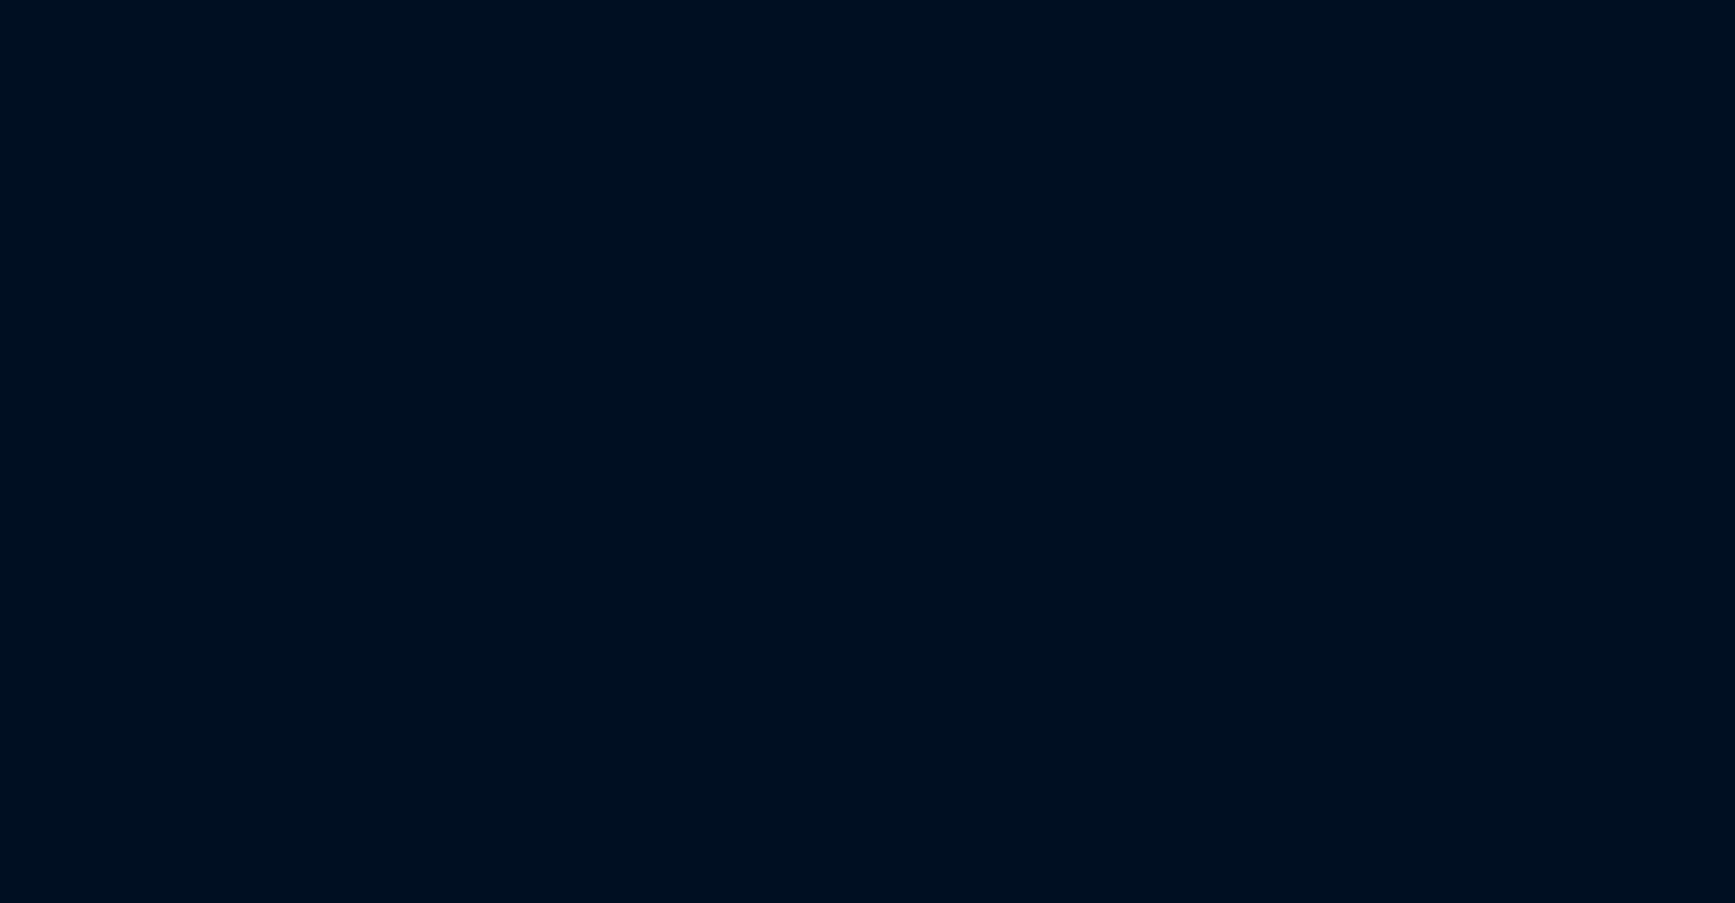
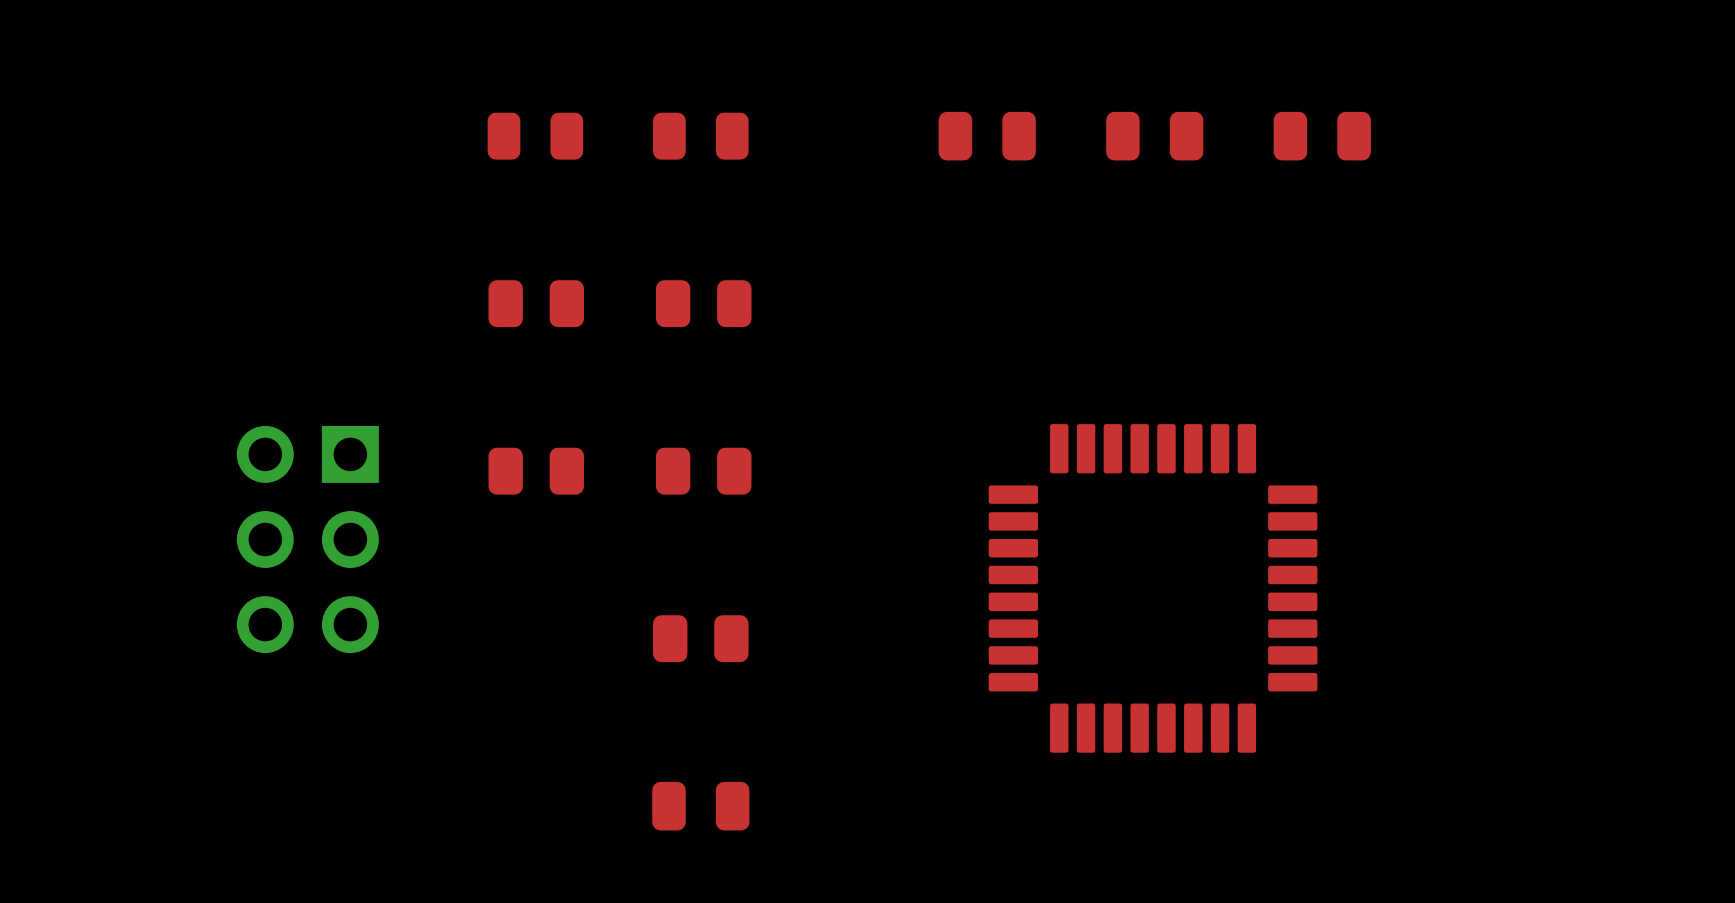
part: none -> (535, 136)
part: none -> (700, 136)
part: none -> (987, 136)
part: none -> (1154, 136)
part: none -> (1322, 136)
part: none -> (536, 303)
part: none -> (703, 303)
part: none -> (536, 471)
part: none -> (703, 471)
part: none -> (307, 539)
part: none -> (1153, 588)
part: none -> (700, 638)
part: none -> (700, 806)

